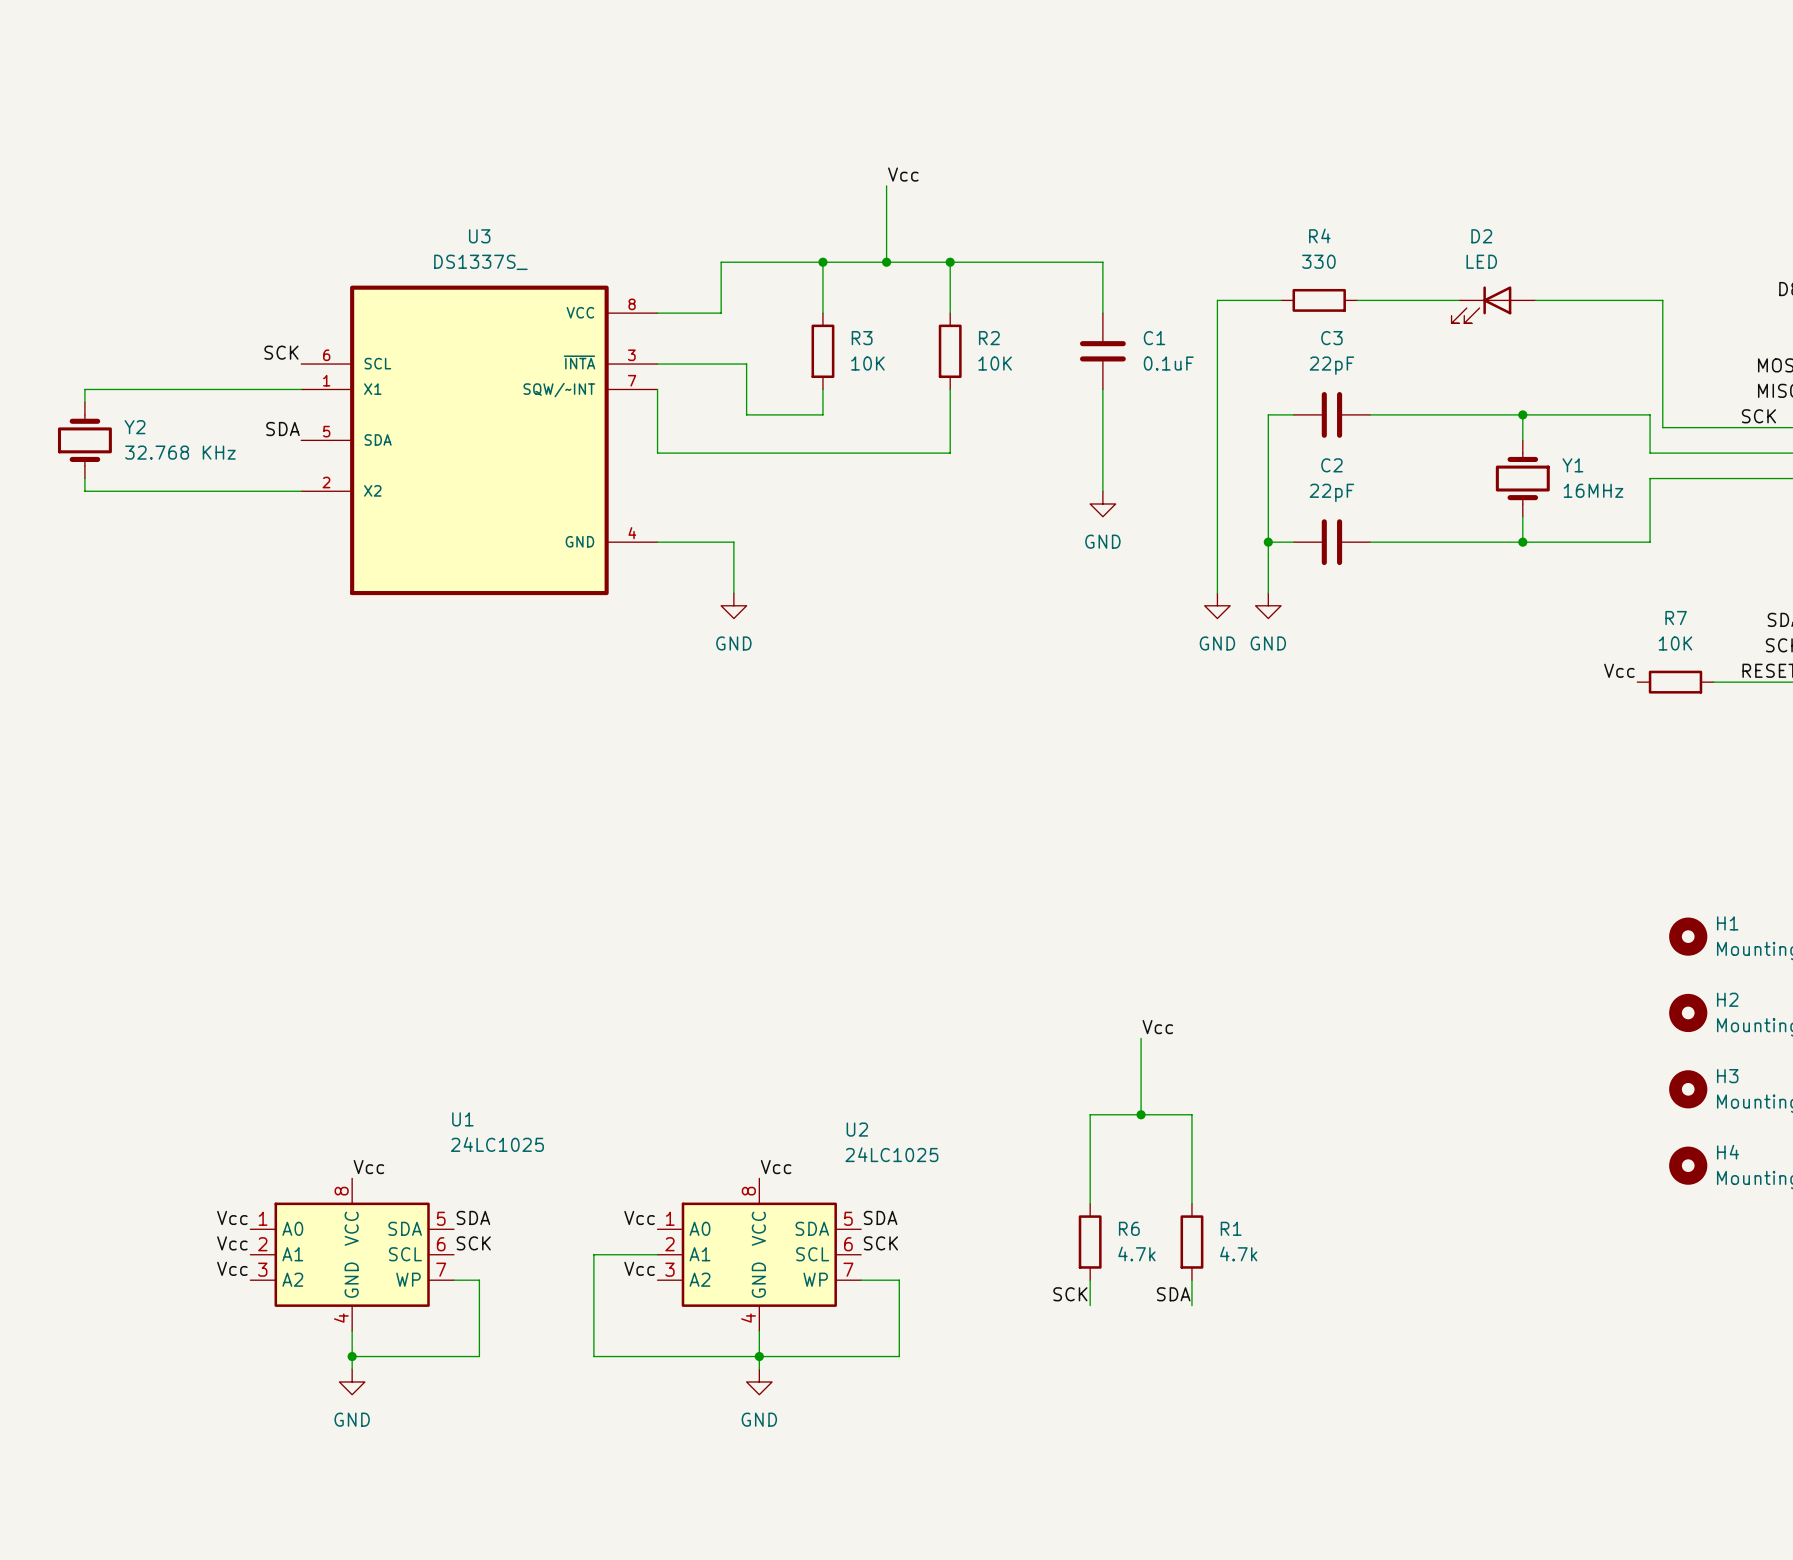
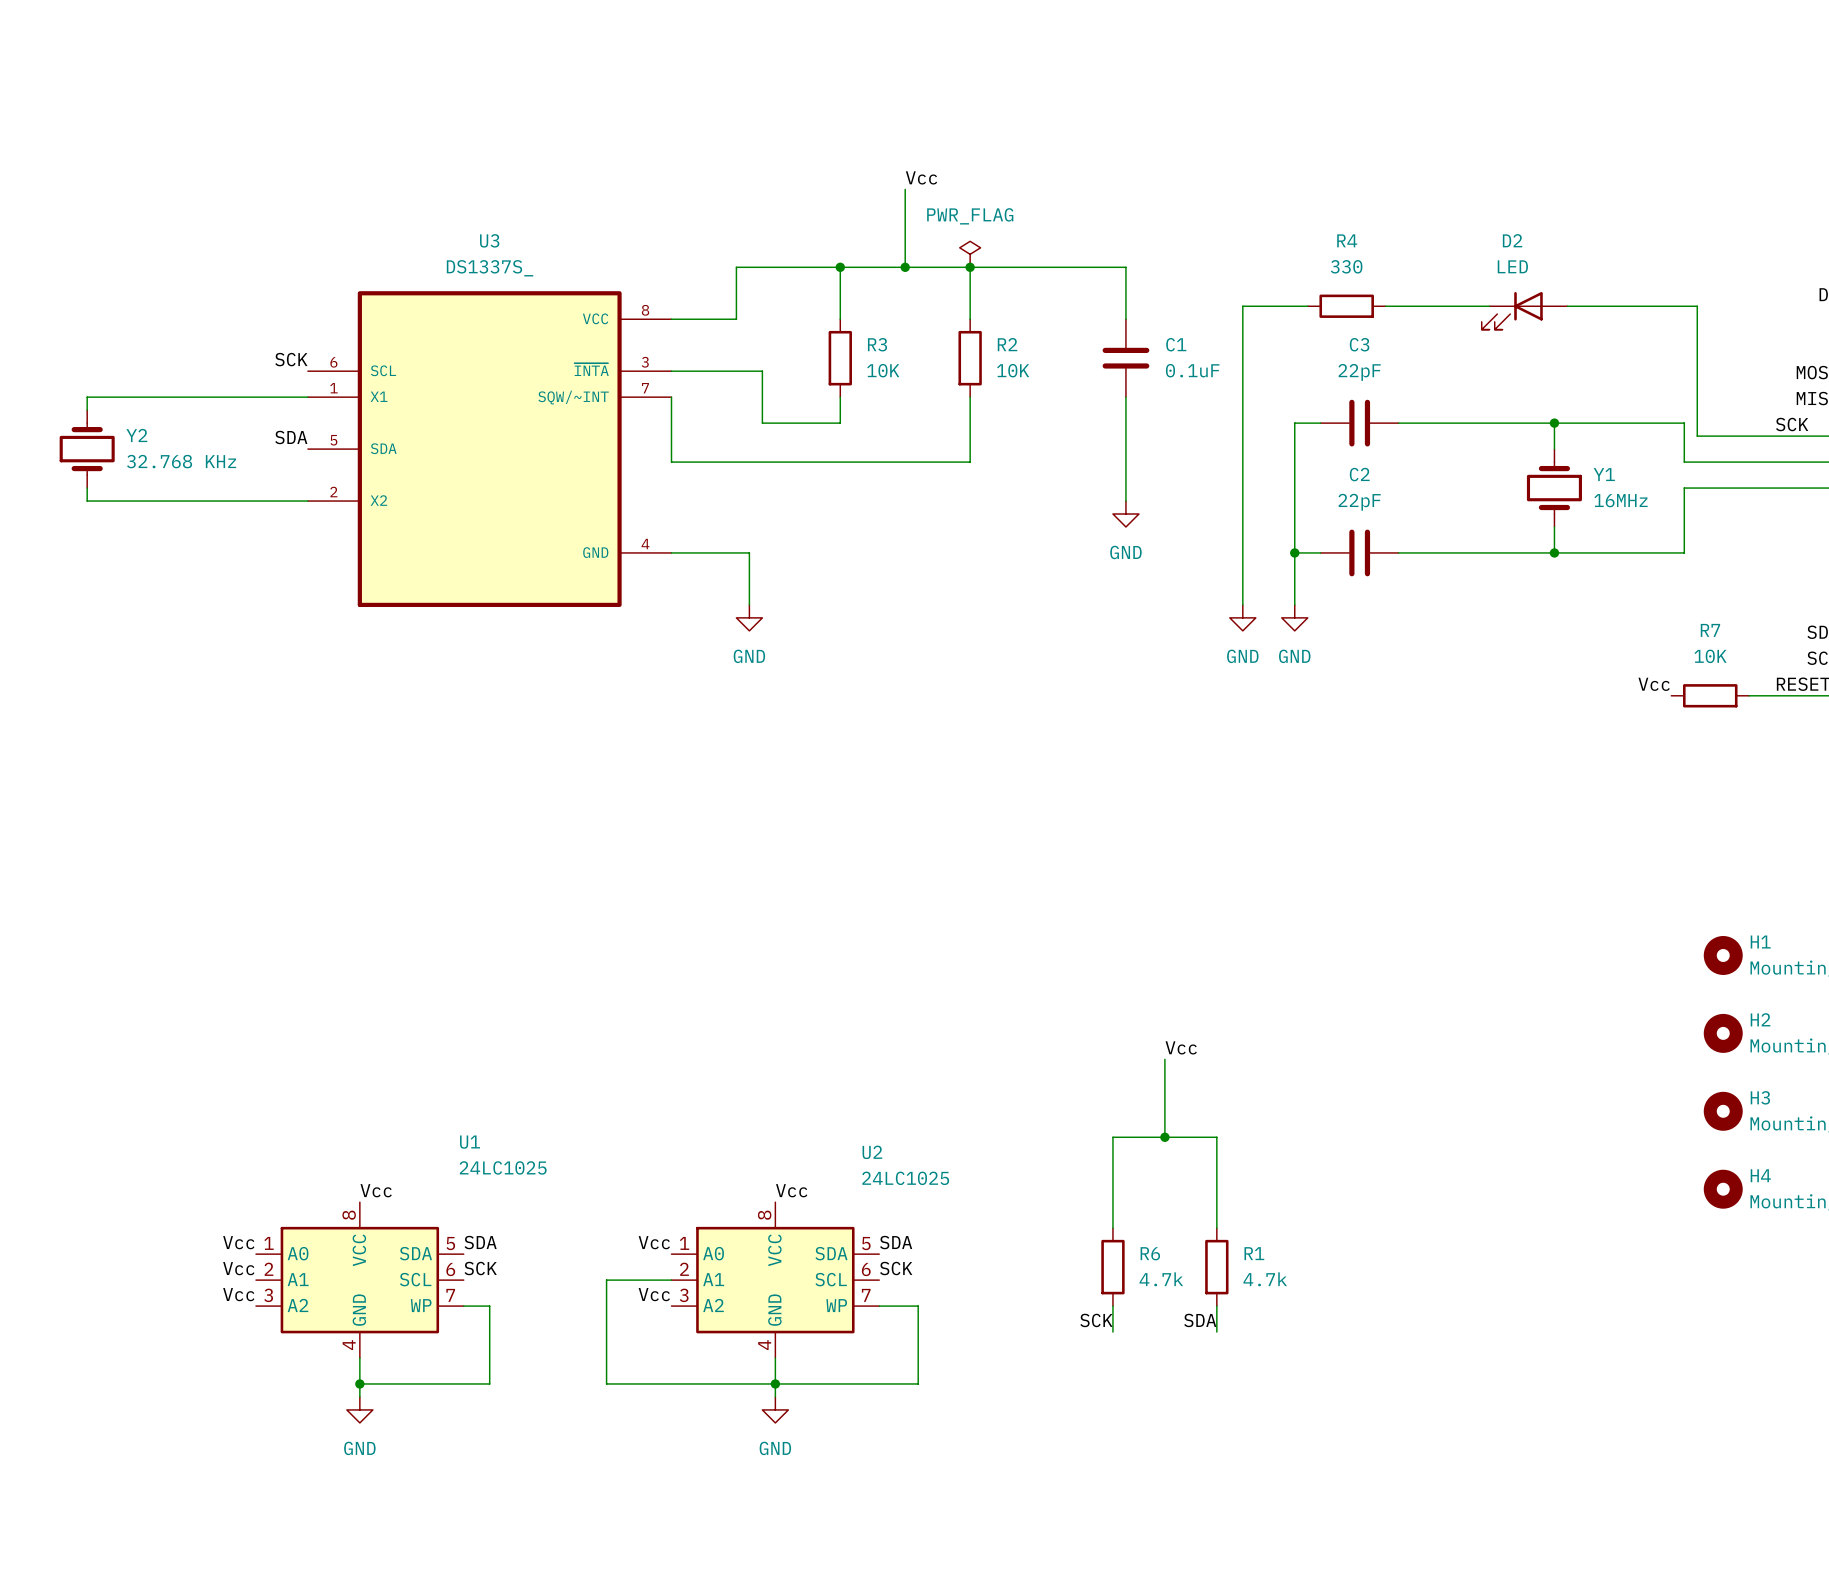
power symbol: none -> PWR_FLAG (970, 254)

